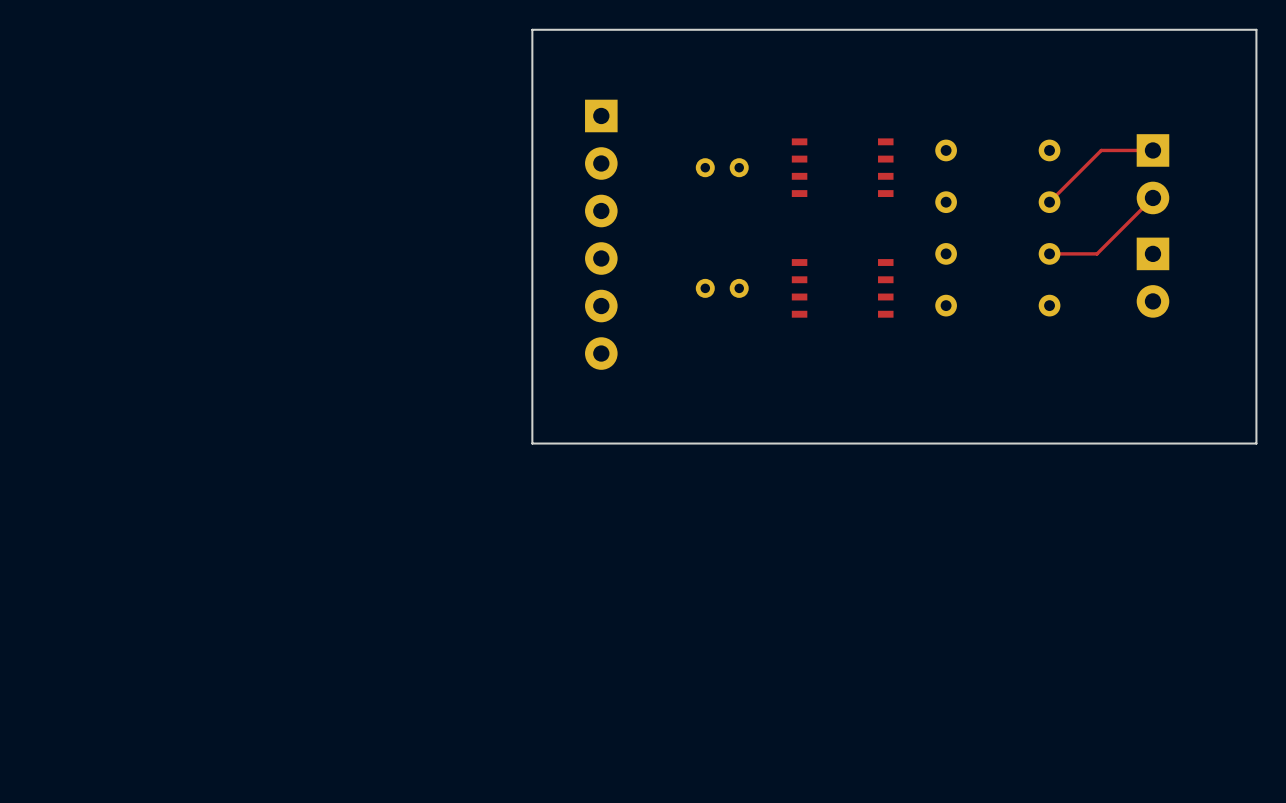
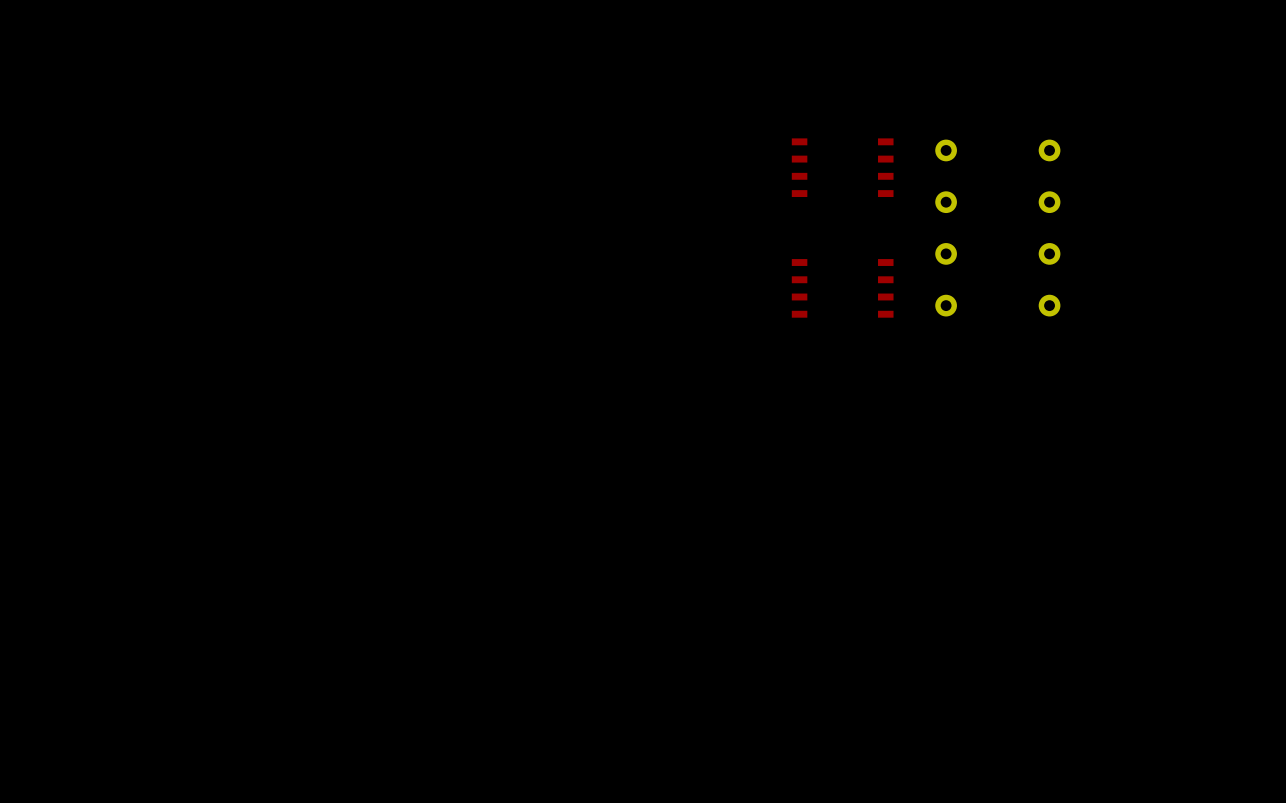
board edge: (1256, 29) (1256, 443) (532, 443) (532, 29) (1256, 29) -> none
top track: (1152, 150) (1101, 150) (1049, 202) -> none
part: (722, 167) -> none
part: (1152, 174) -> none
top track: (1152, 197) (1097, 253) (1049, 253) -> none
part: (601, 234) -> none
part: (1152, 277) -> none
part: (722, 288) -> none

